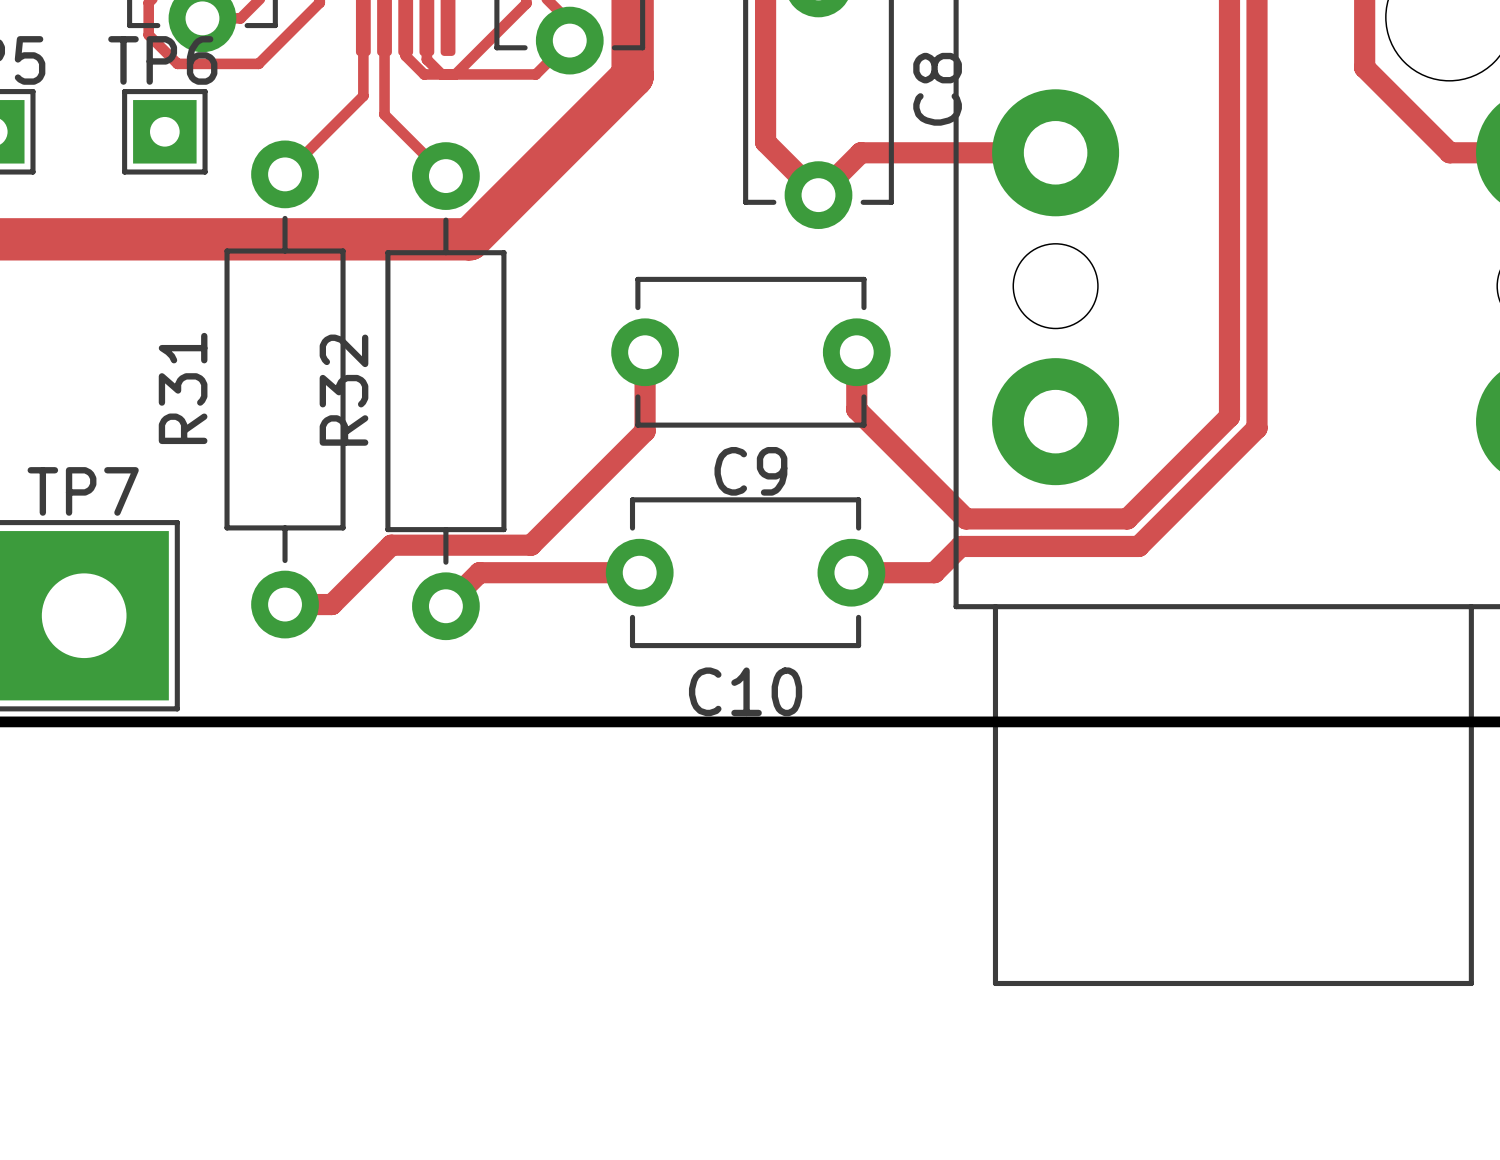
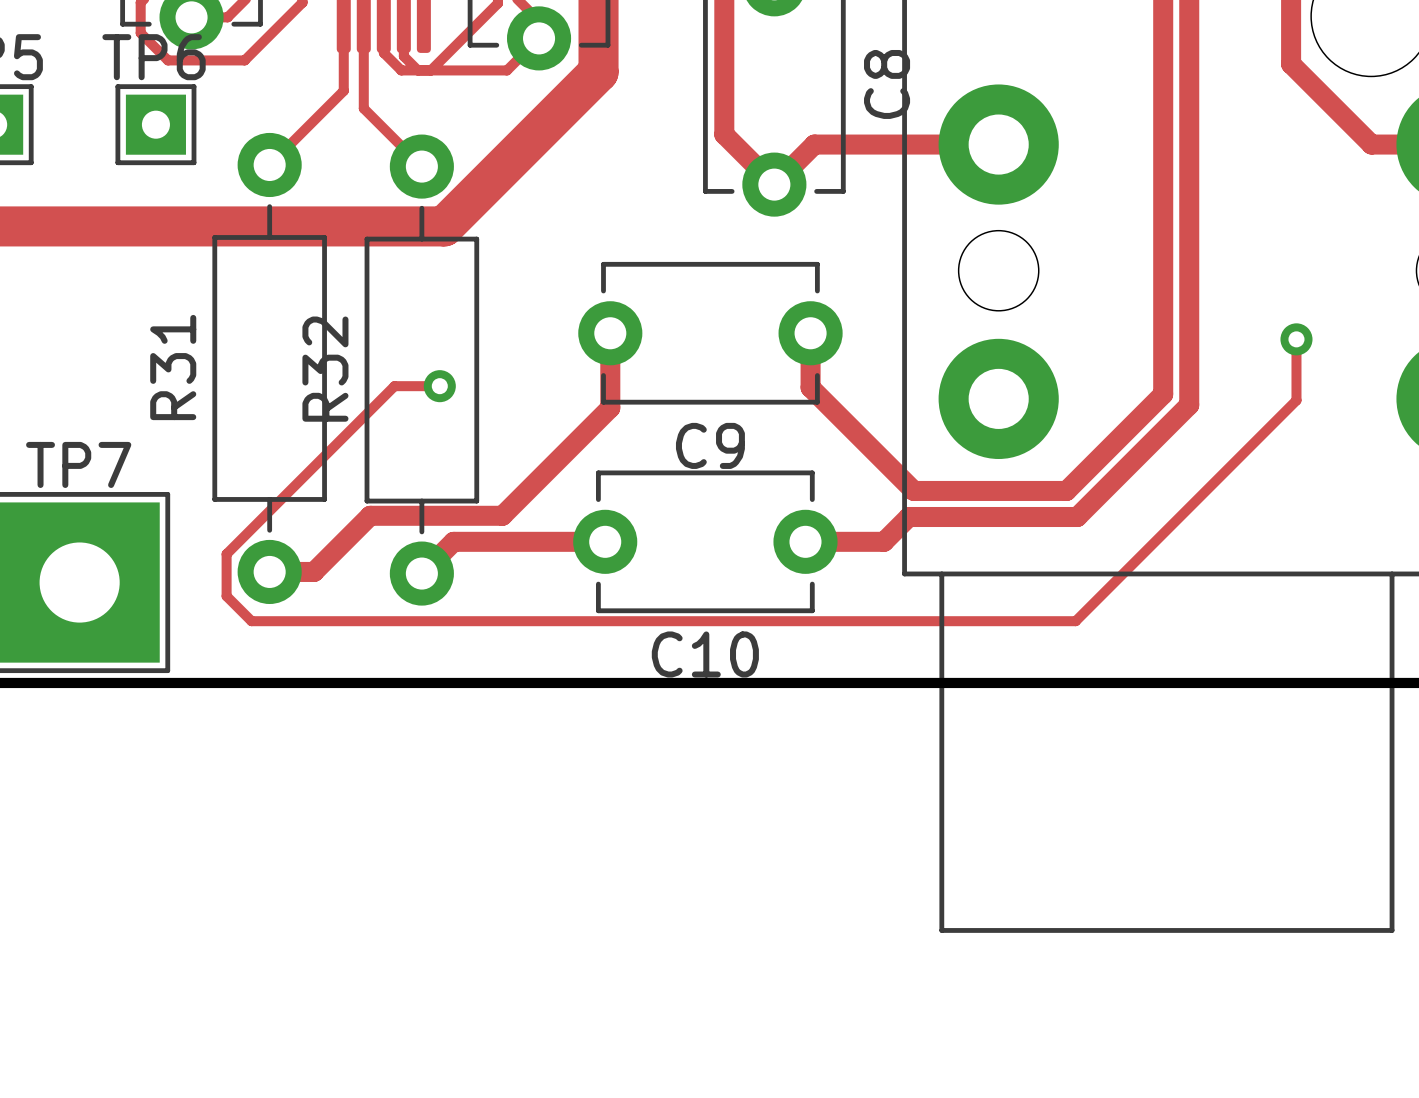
track: none -> (1296, 339) (1296, 400) (1075, 621) (251, 621) (226, 596) (226, 554) (394, 386) (439, 386)
via: none -> (1296, 339)
via: none -> (439, 386)

